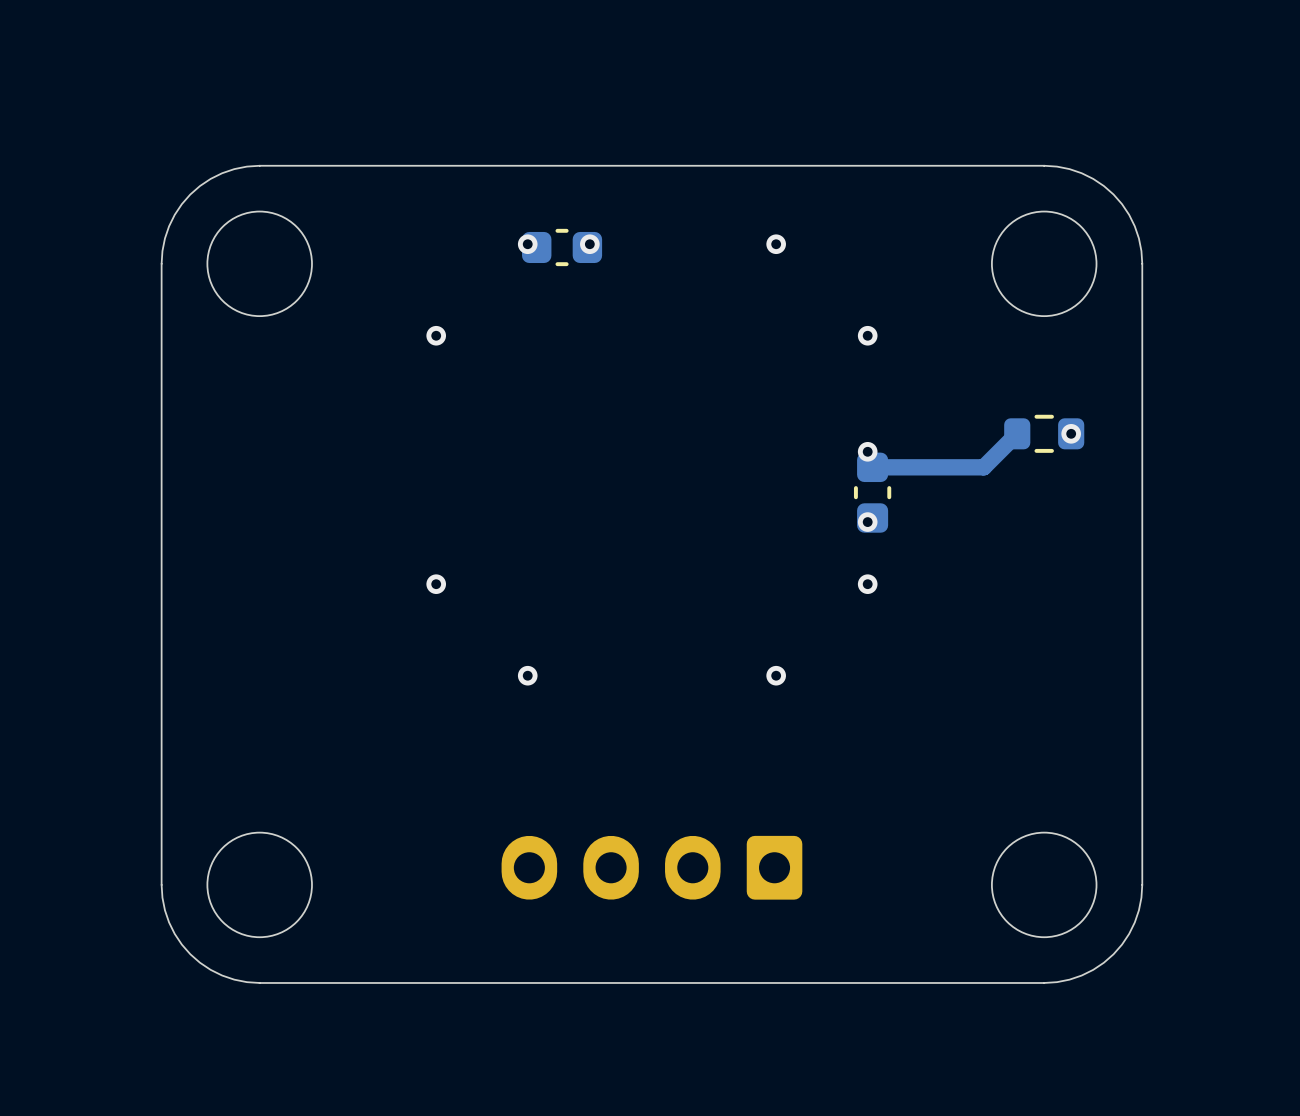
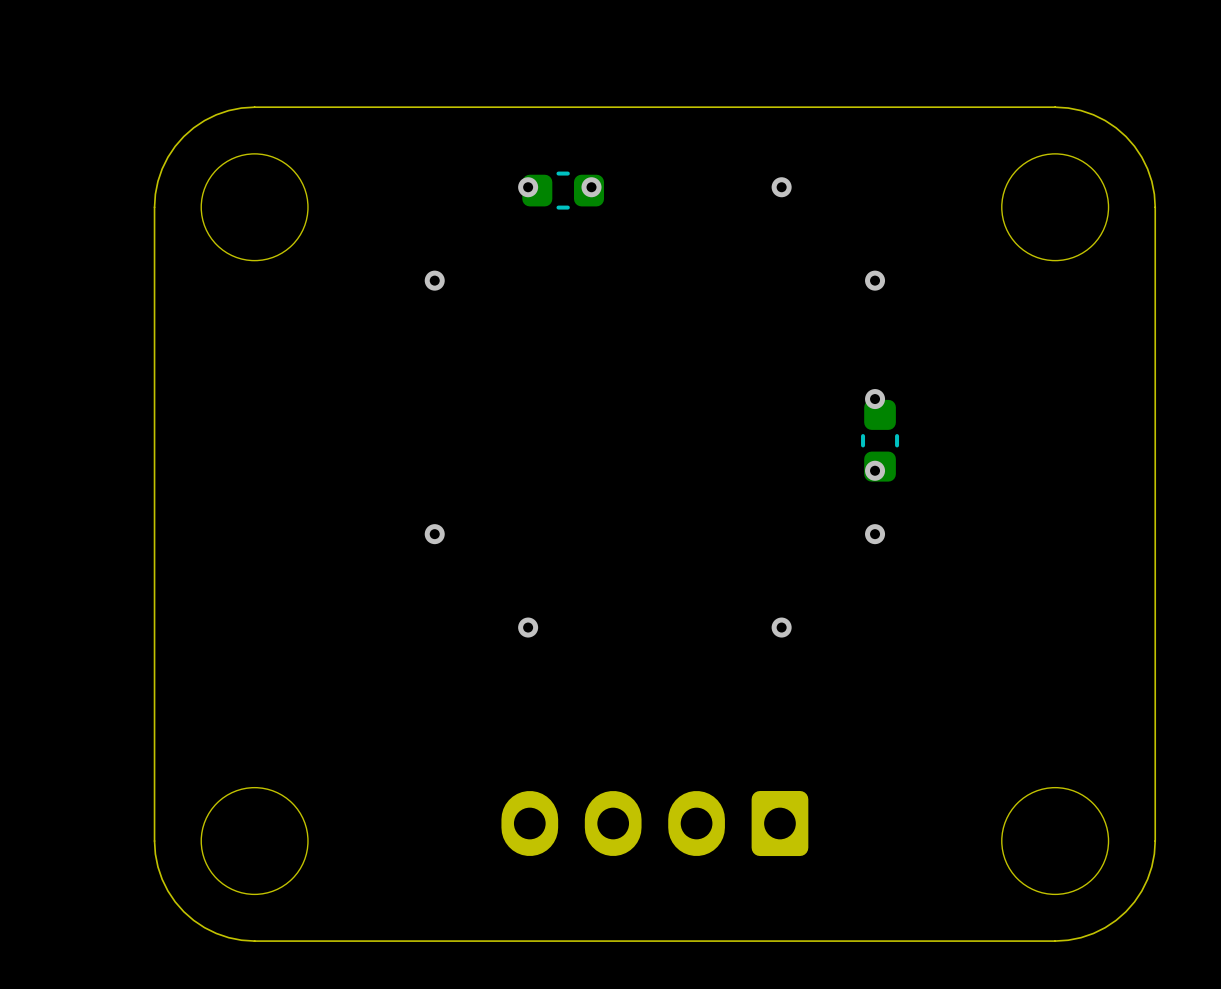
track: (1017, 433) (983, 467) (872, 467) -> none
part: (1044, 433) -> none
via: (1071, 433) -> none

